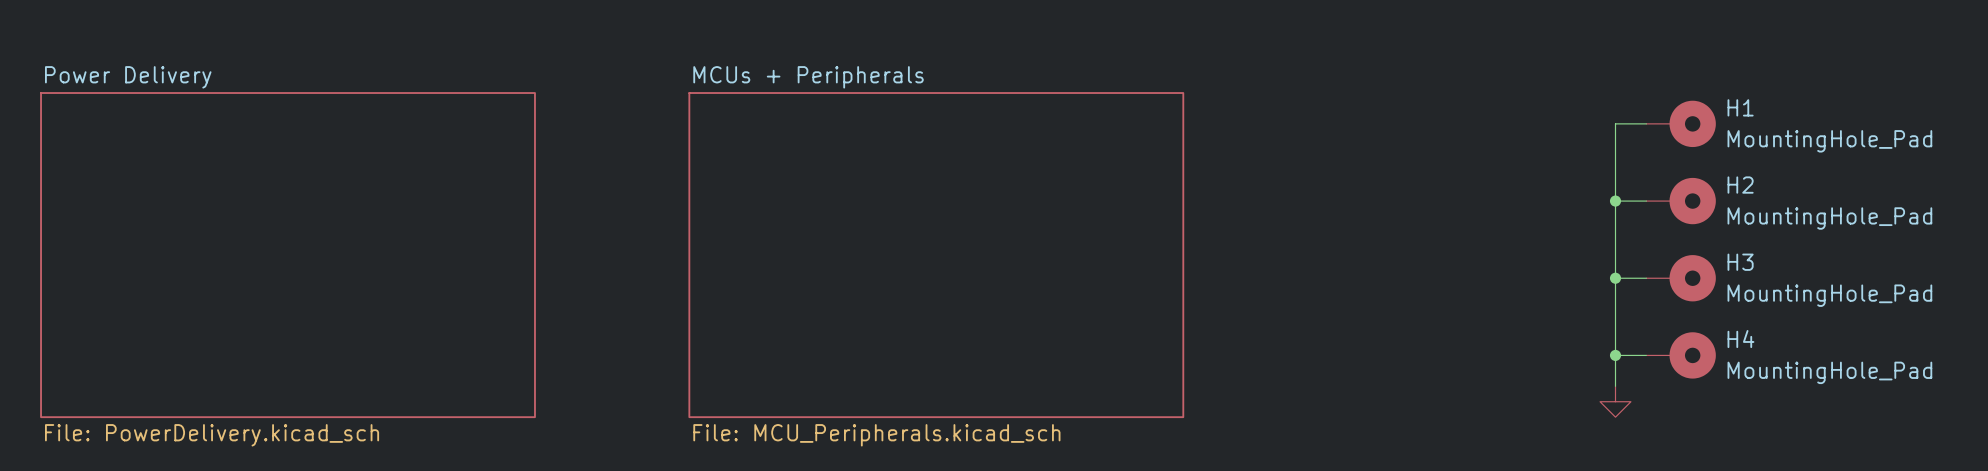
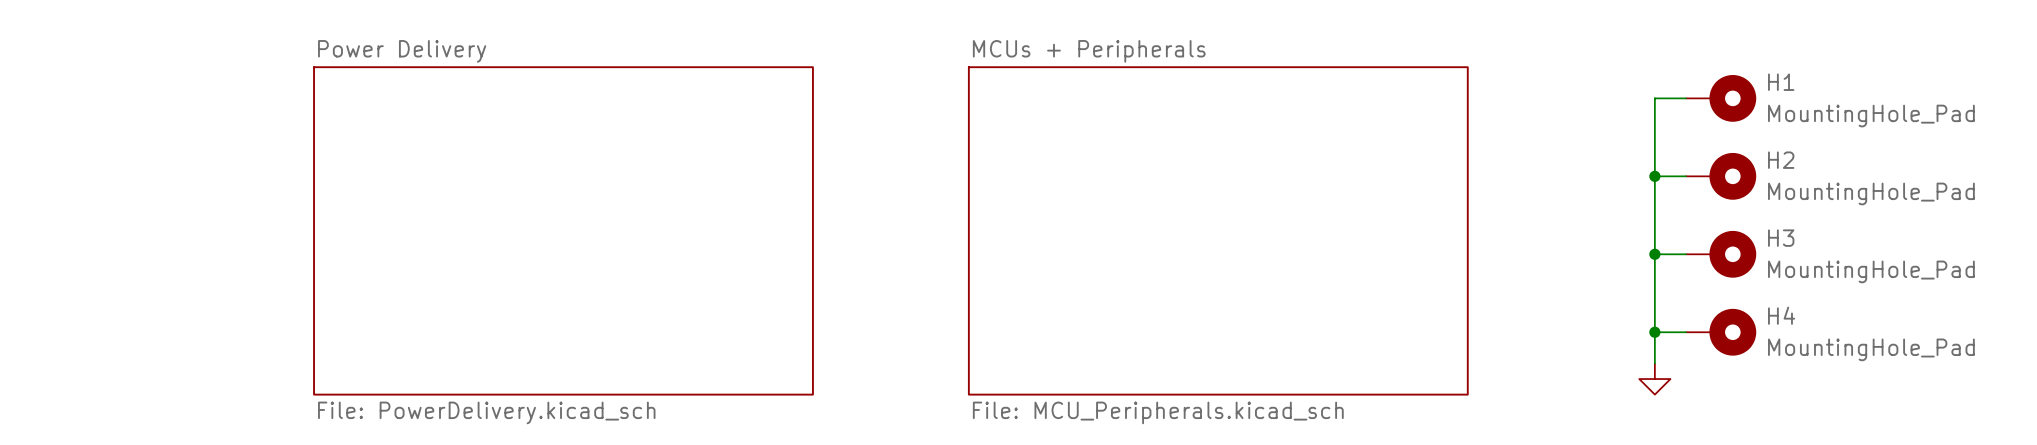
sheet Power Delivery position: (288, 255) -> (563, 230)
sheet MCUs + Peripherals position: (936, 255) -> (1218, 230)

